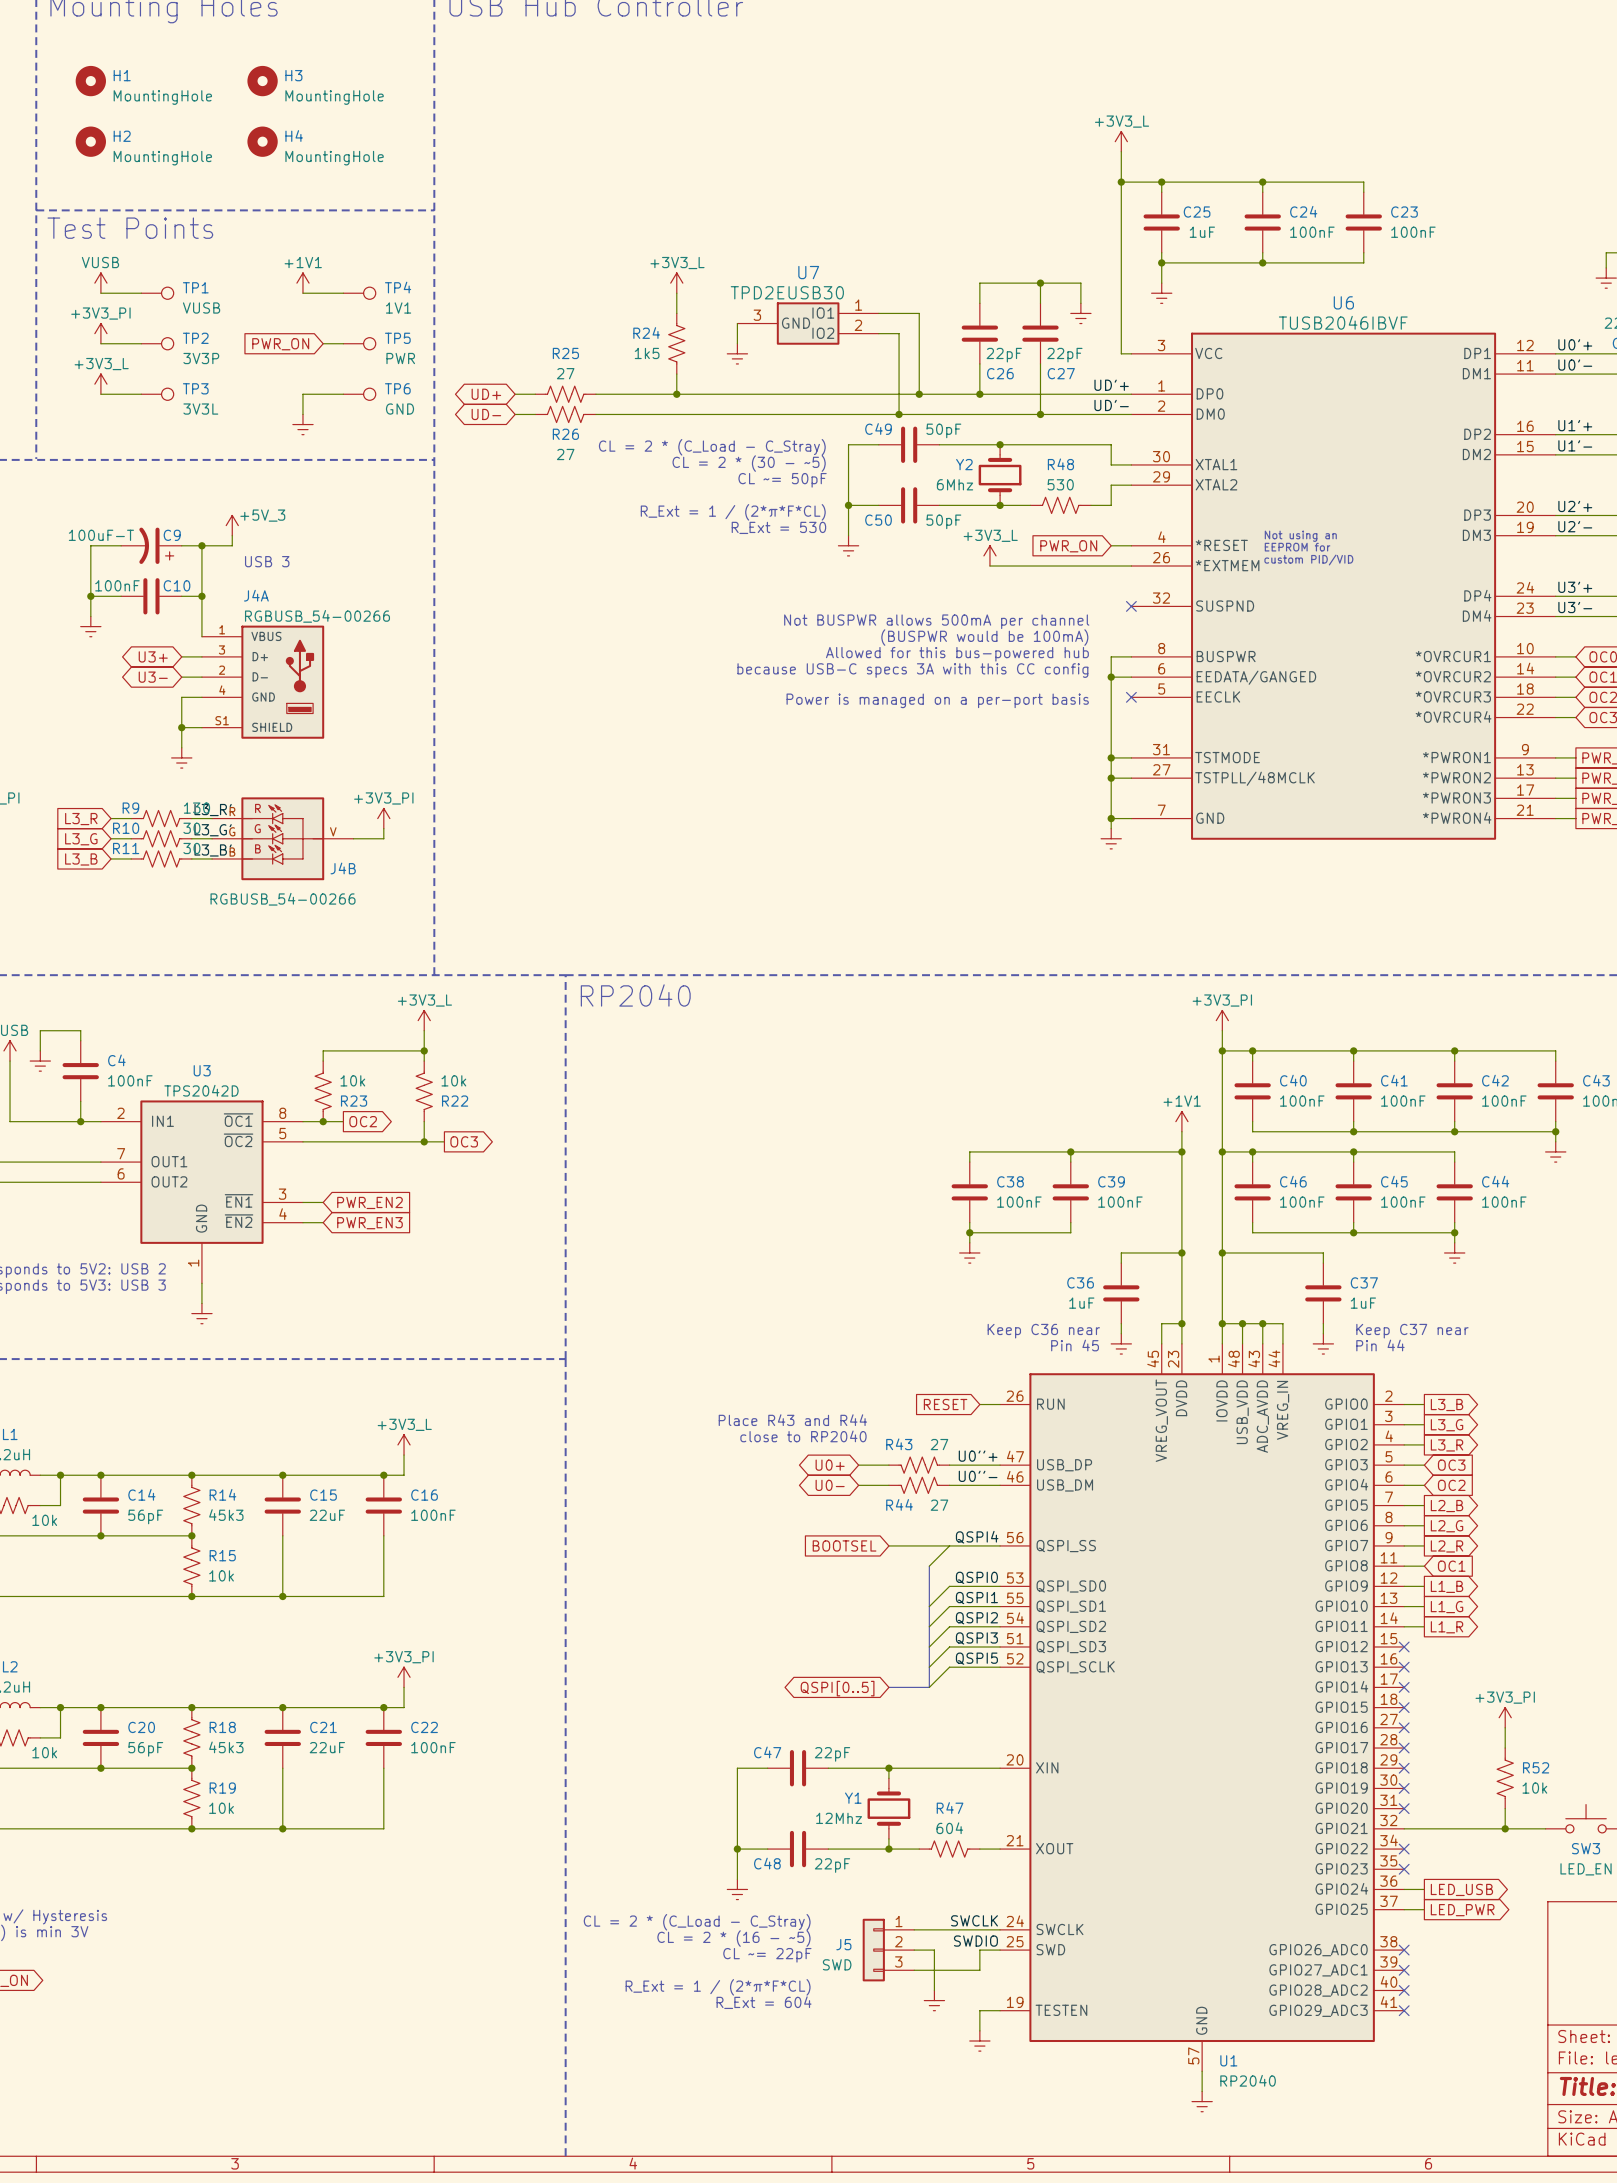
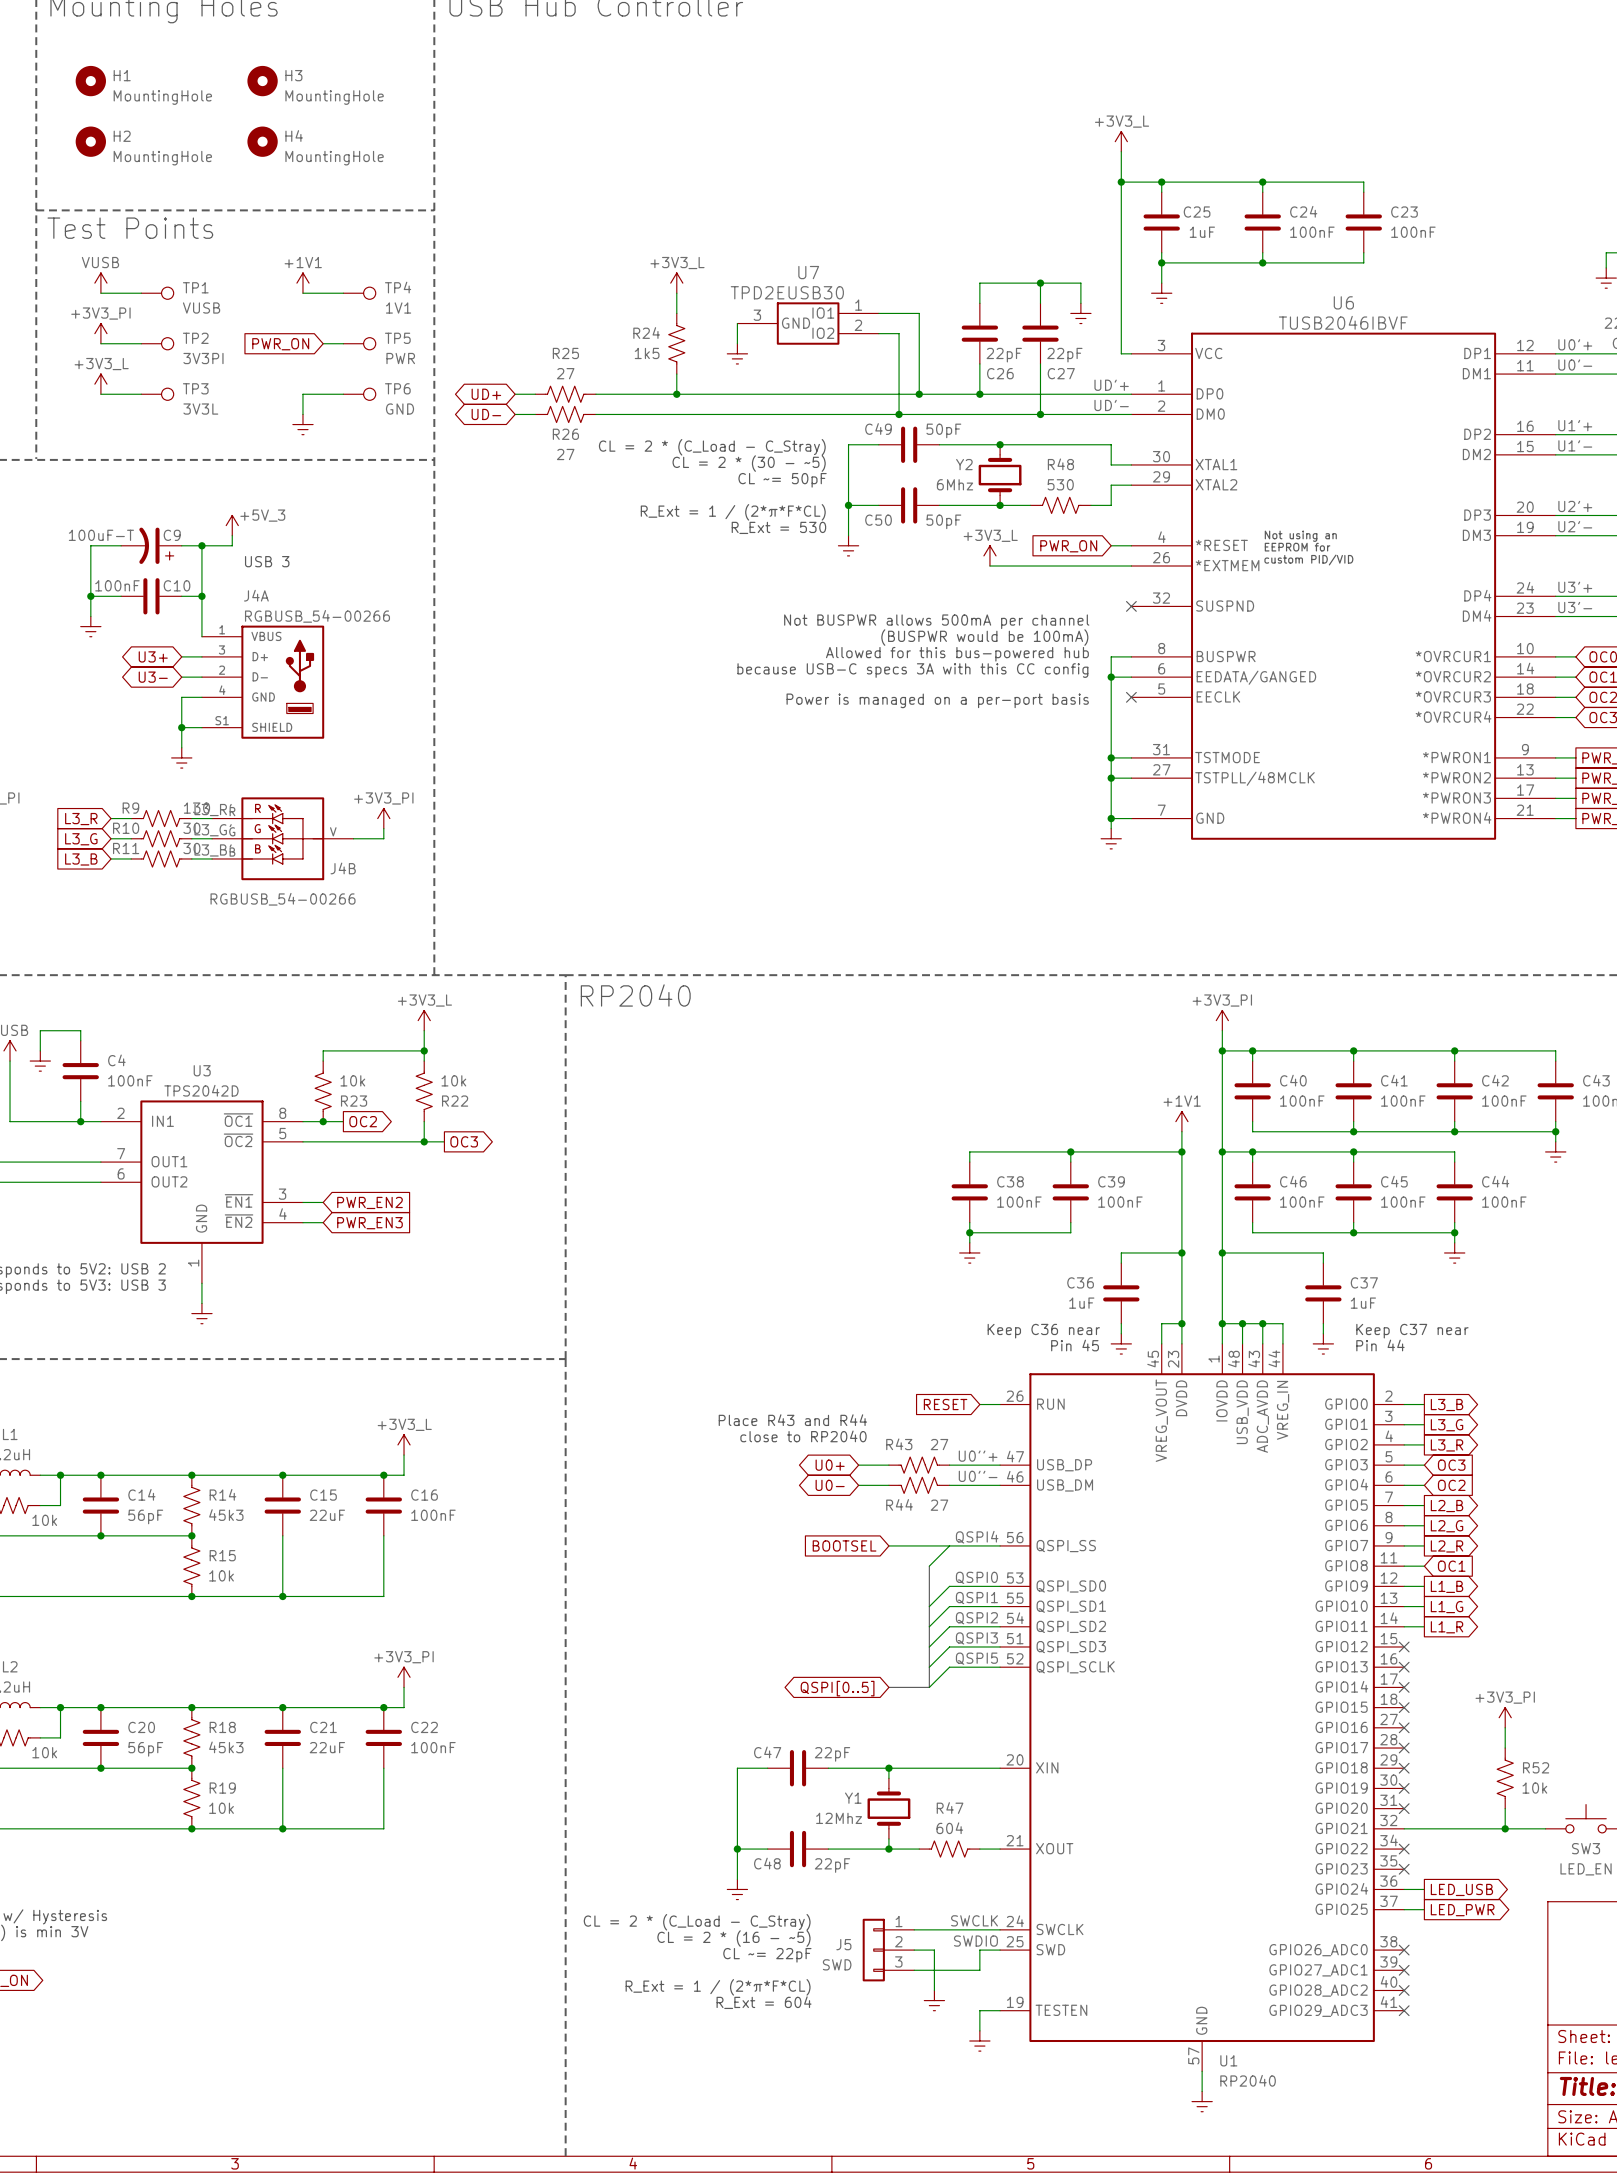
TP2 value: 3V3P (201, 358) -> 3V3PI (203, 358)

